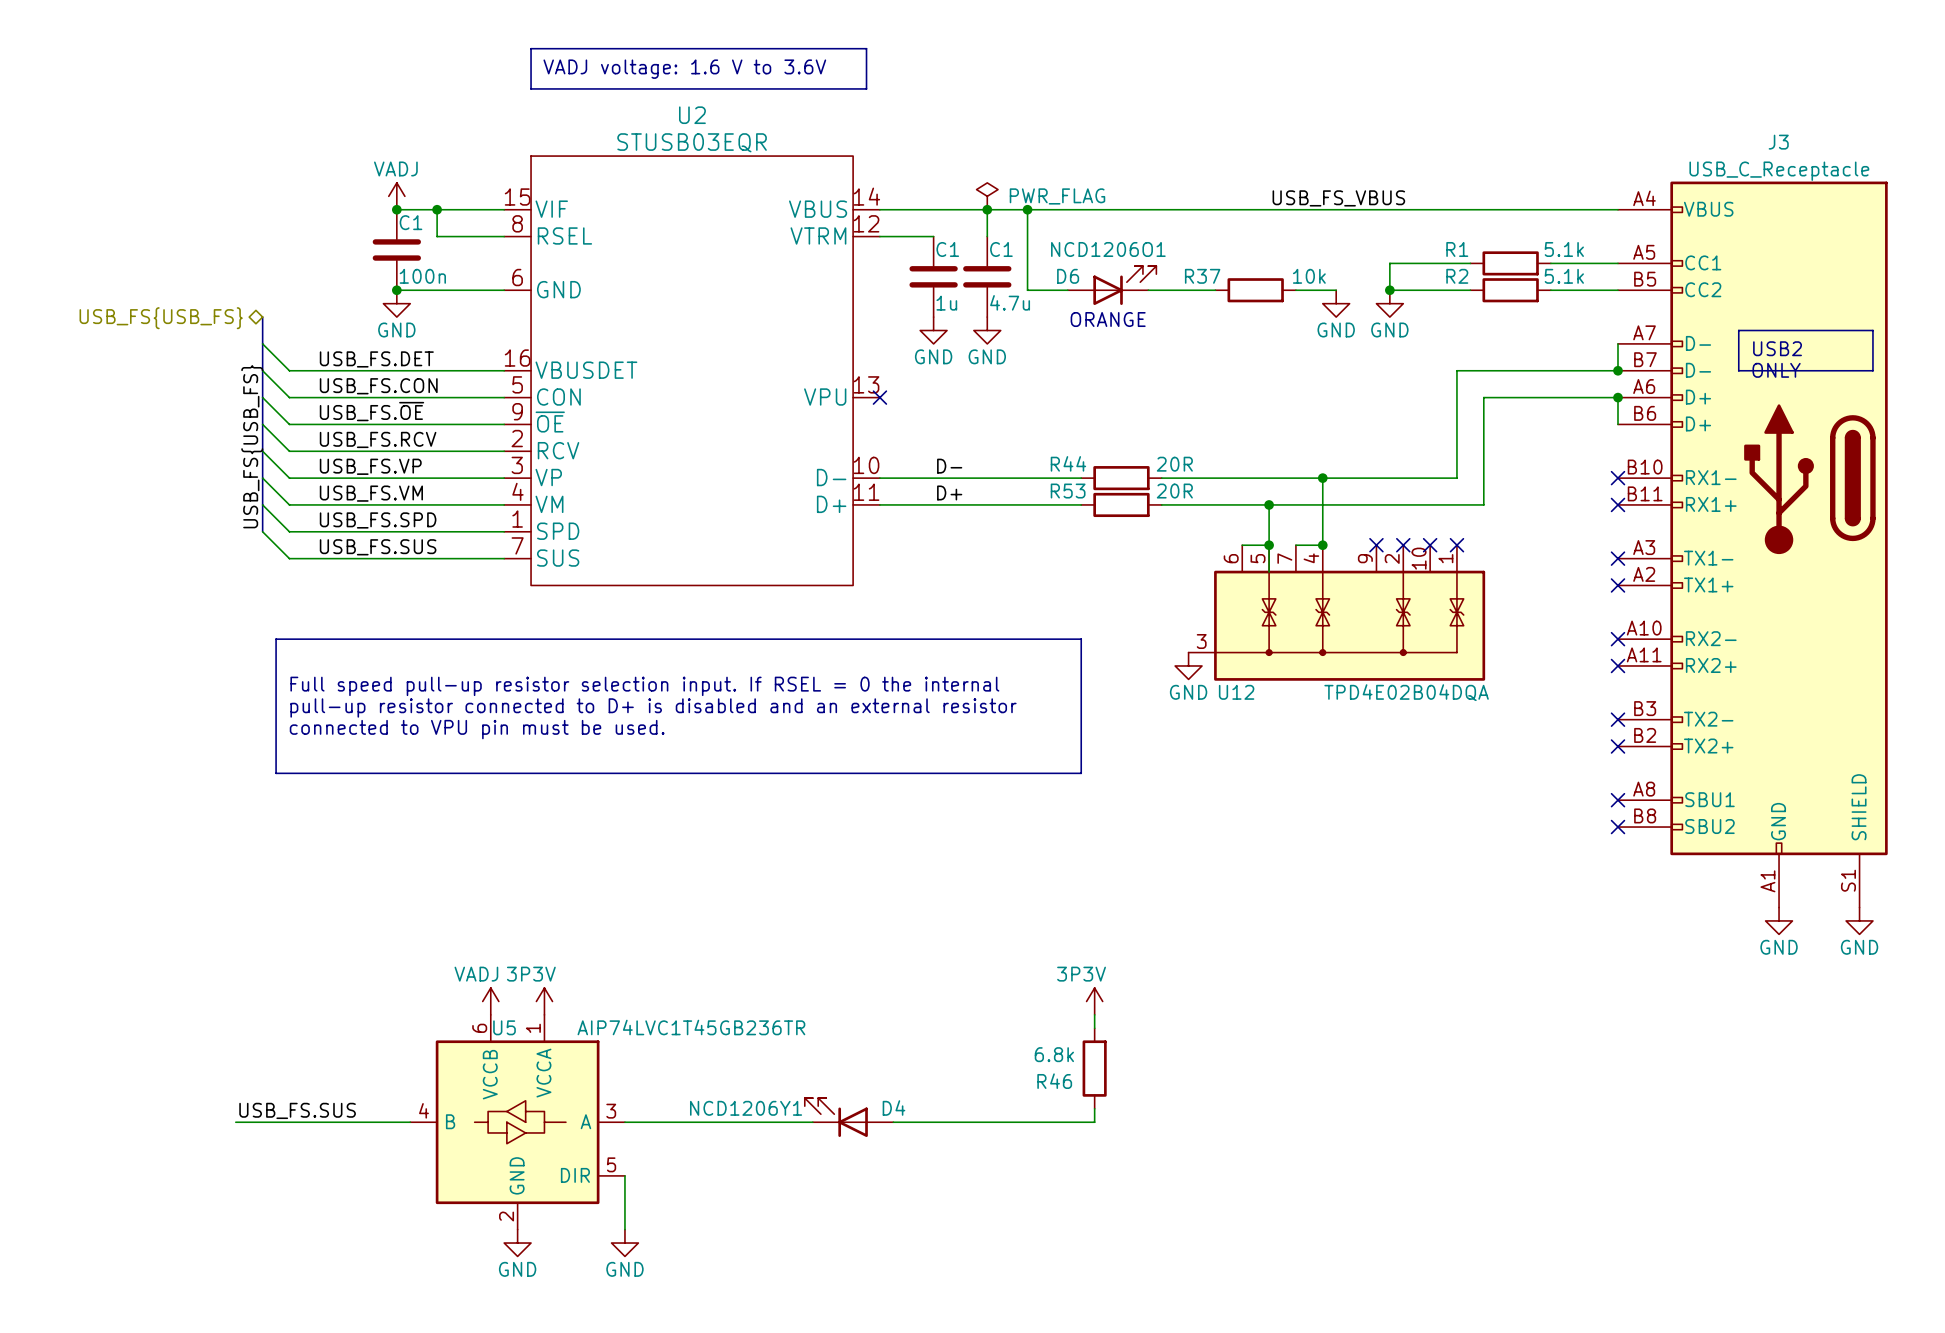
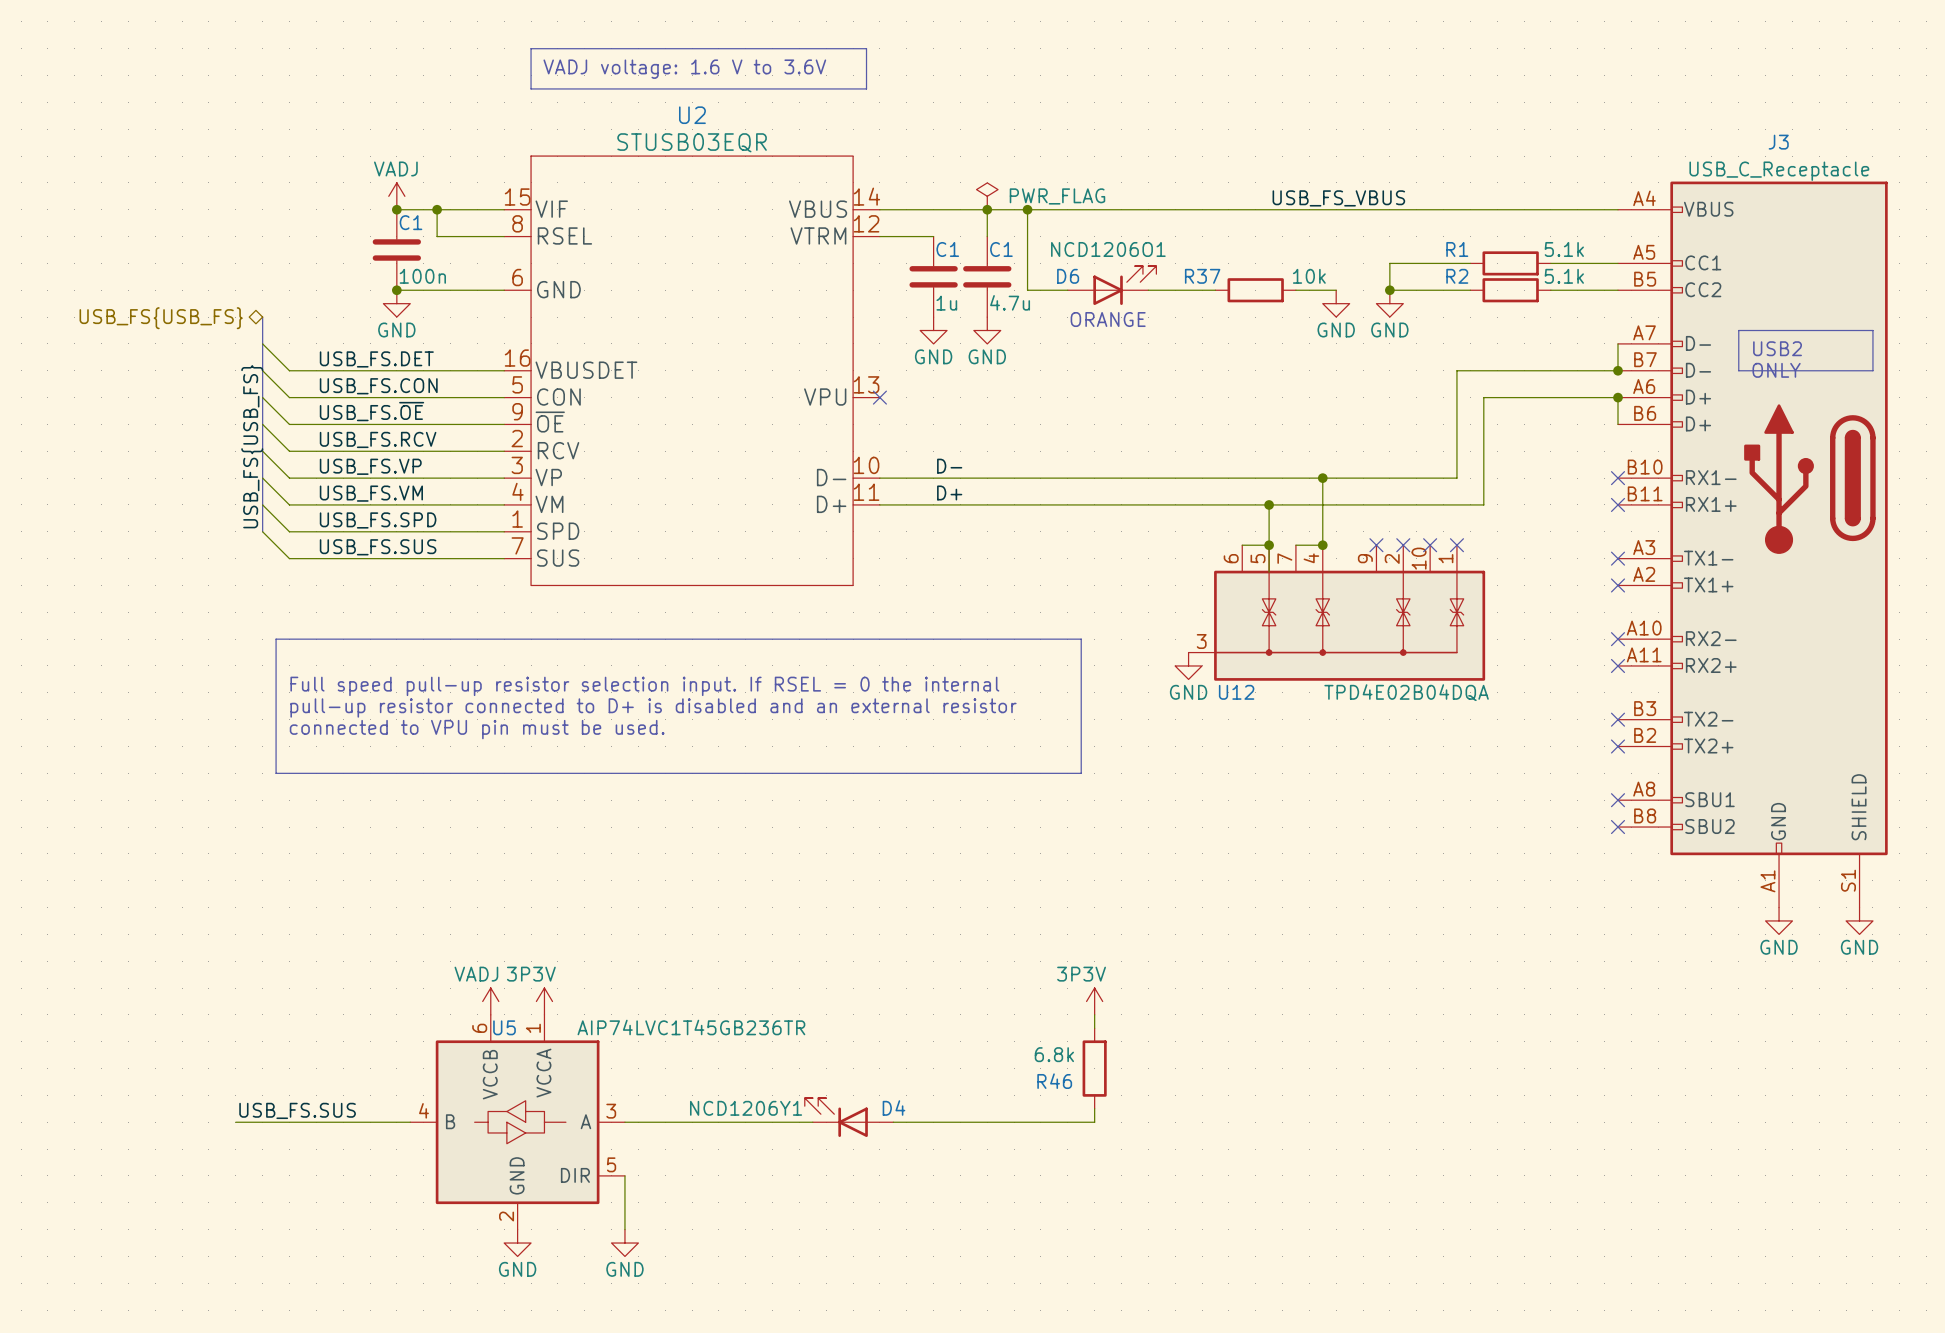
wire: none -> (1081, 478) (1161, 478)
R44: 20R (1121, 478) -> none
wire: none -> (1081, 504) (1161, 504)
R53: 20R (1121, 504) -> none

